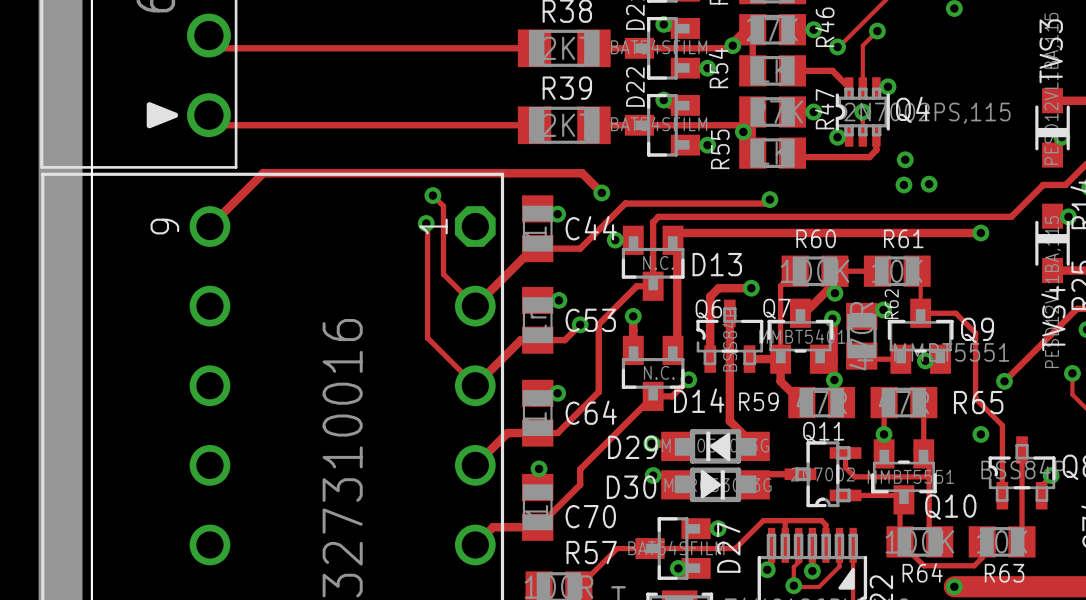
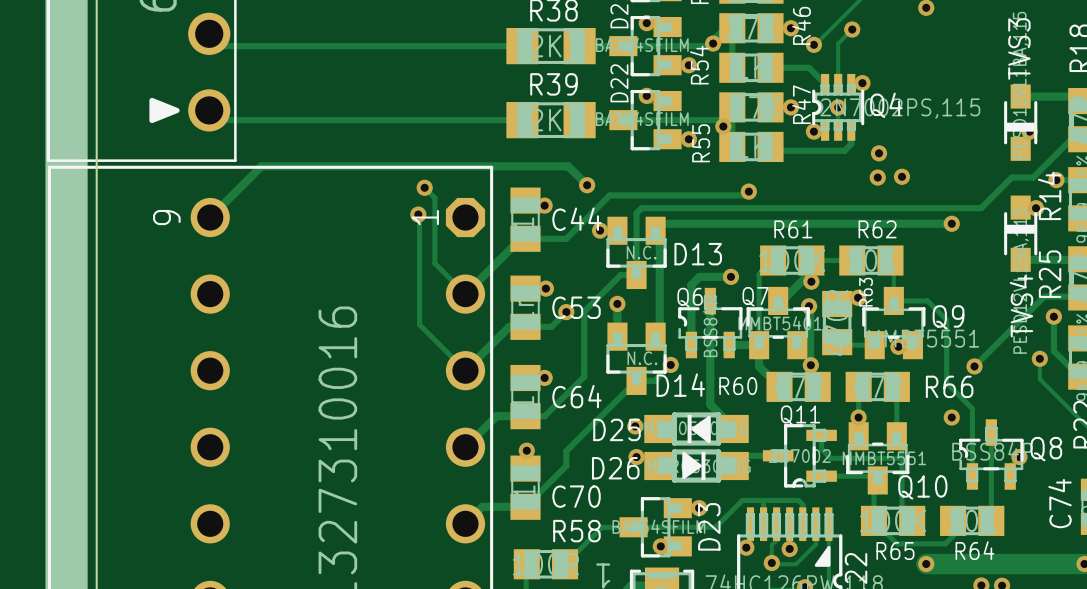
R60 name: R60 (816, 238) -> R61 (793, 229)
R61 name: R61 (903, 238) -> R62 (877, 229)
R62 name: R62 (891, 304) -> R63 (866, 292)
R59 name: R59 (758, 401) -> R60 (738, 386)
R65 name: R65 (978, 402) -> R66 (949, 386)
D29 name: D29 (632, 447) -> D25 (617, 429)
D30 name: D30 (631, 487) -> D26 (615, 468)
D27 name: D27 (728, 547) -> D23 (709, 526)
R57 name: R57 (591, 552) -> R58 (576, 531)
R64 name: R64 (922, 572) -> R65 (895, 551)
R63 name: R63 (1004, 573) -> R64 (974, 550)

